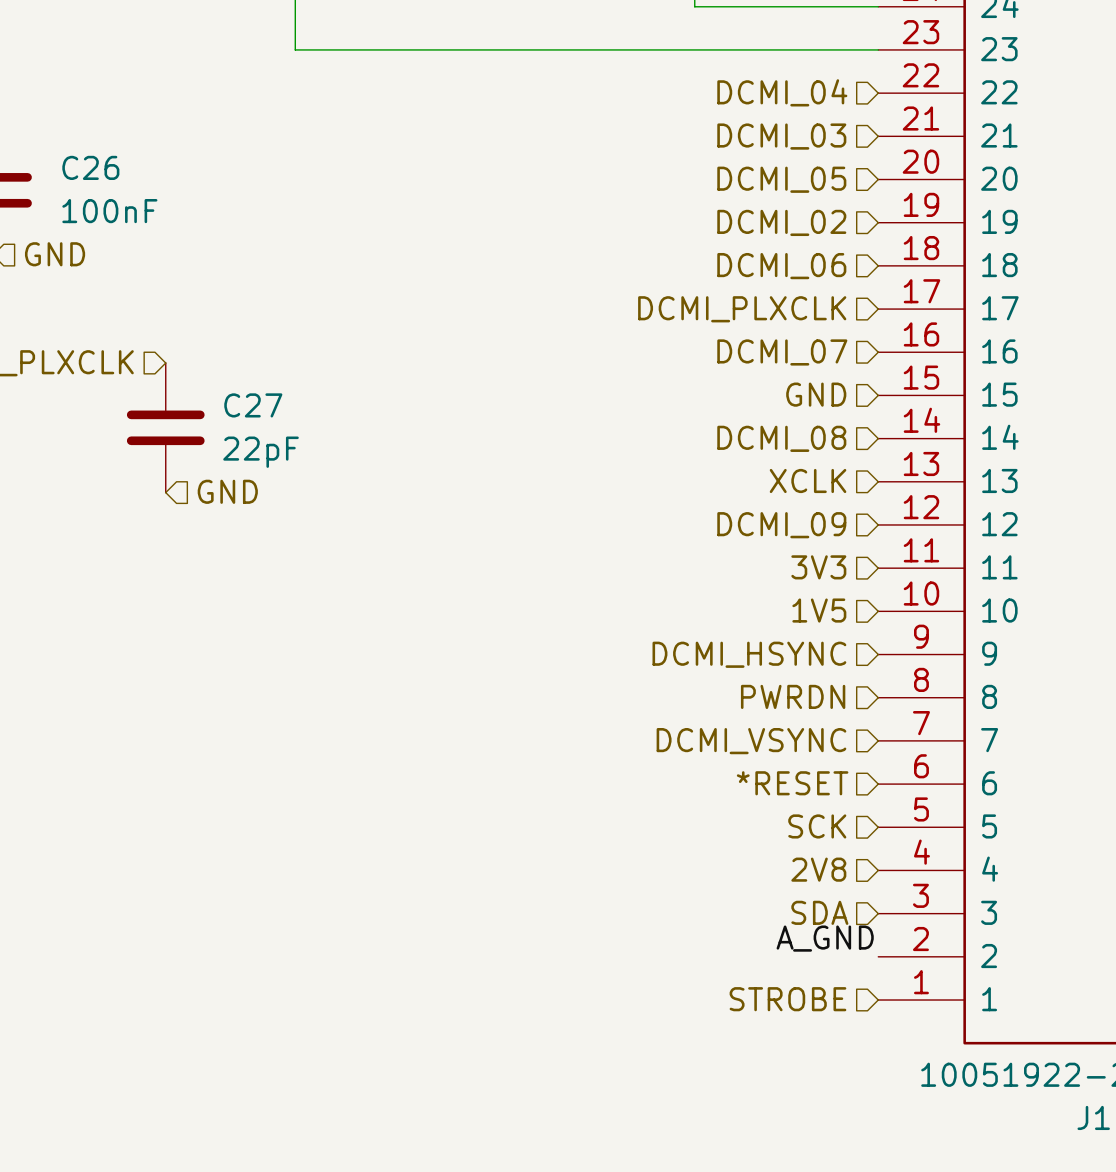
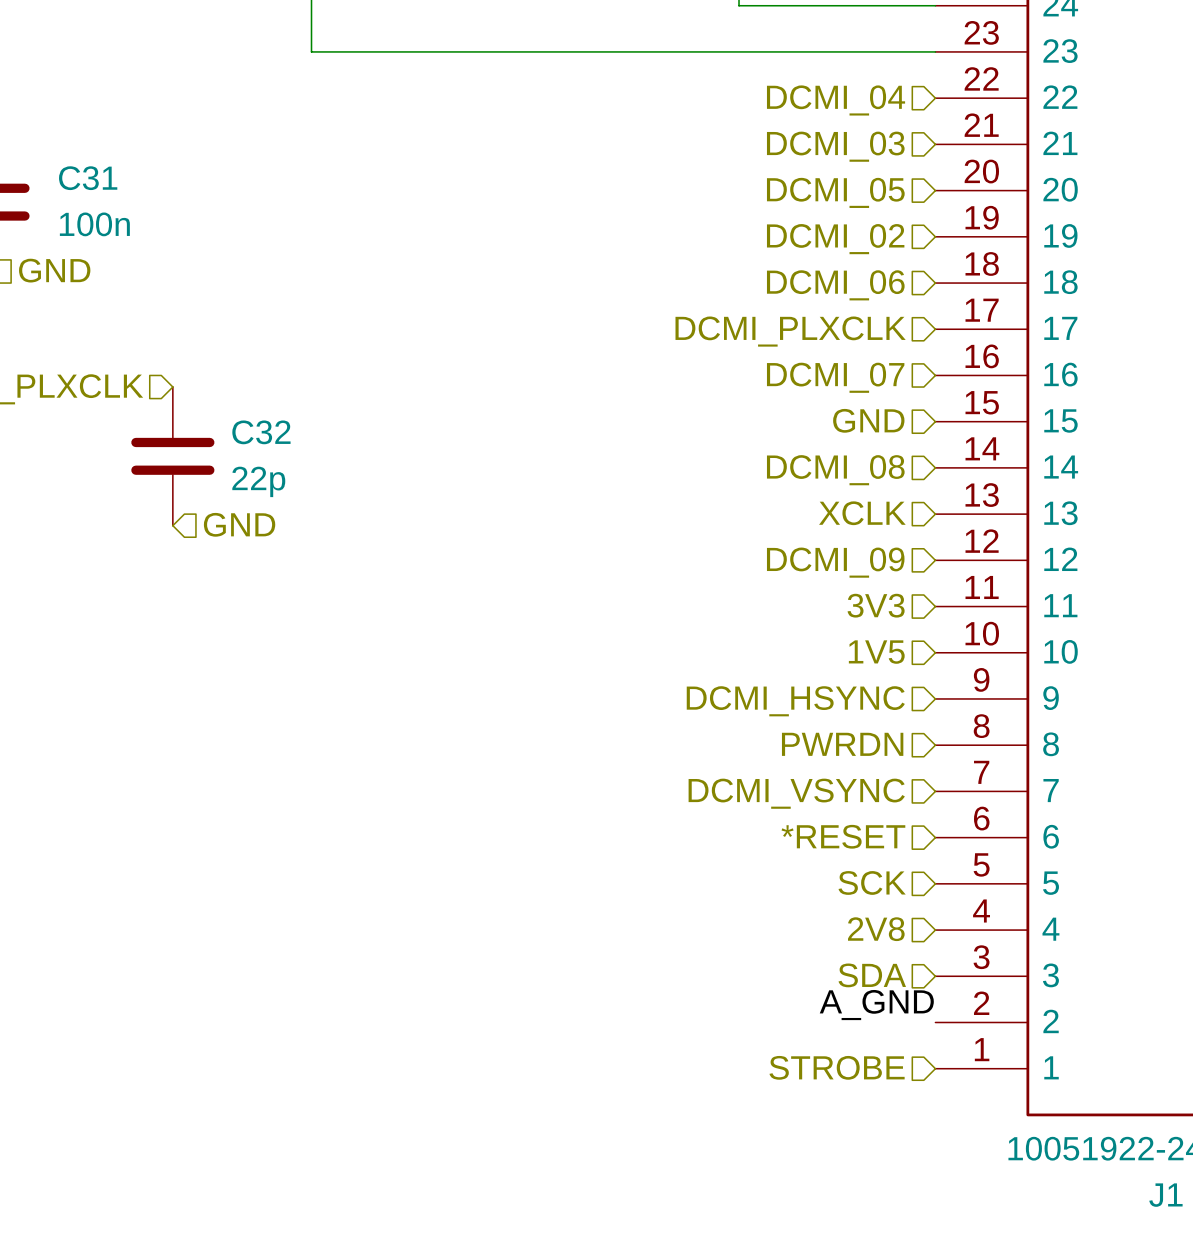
C26 name: C26 (90, 167) -> C31 (88, 178)
C26 value: 100nF (109, 211) -> 100n (94, 224)
C27 name: C27 (253, 405) -> C32 (261, 432)
C27 value: 22pF (261, 452) -> 22p (258, 481)

